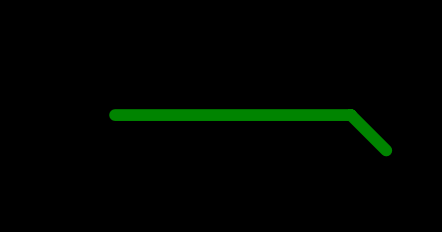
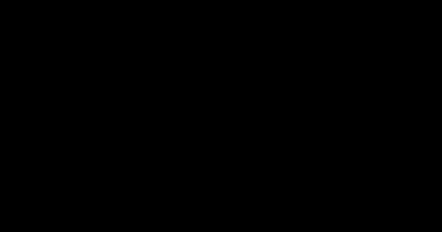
track: (115, 115) (350, 115) (386, 150) -> none

